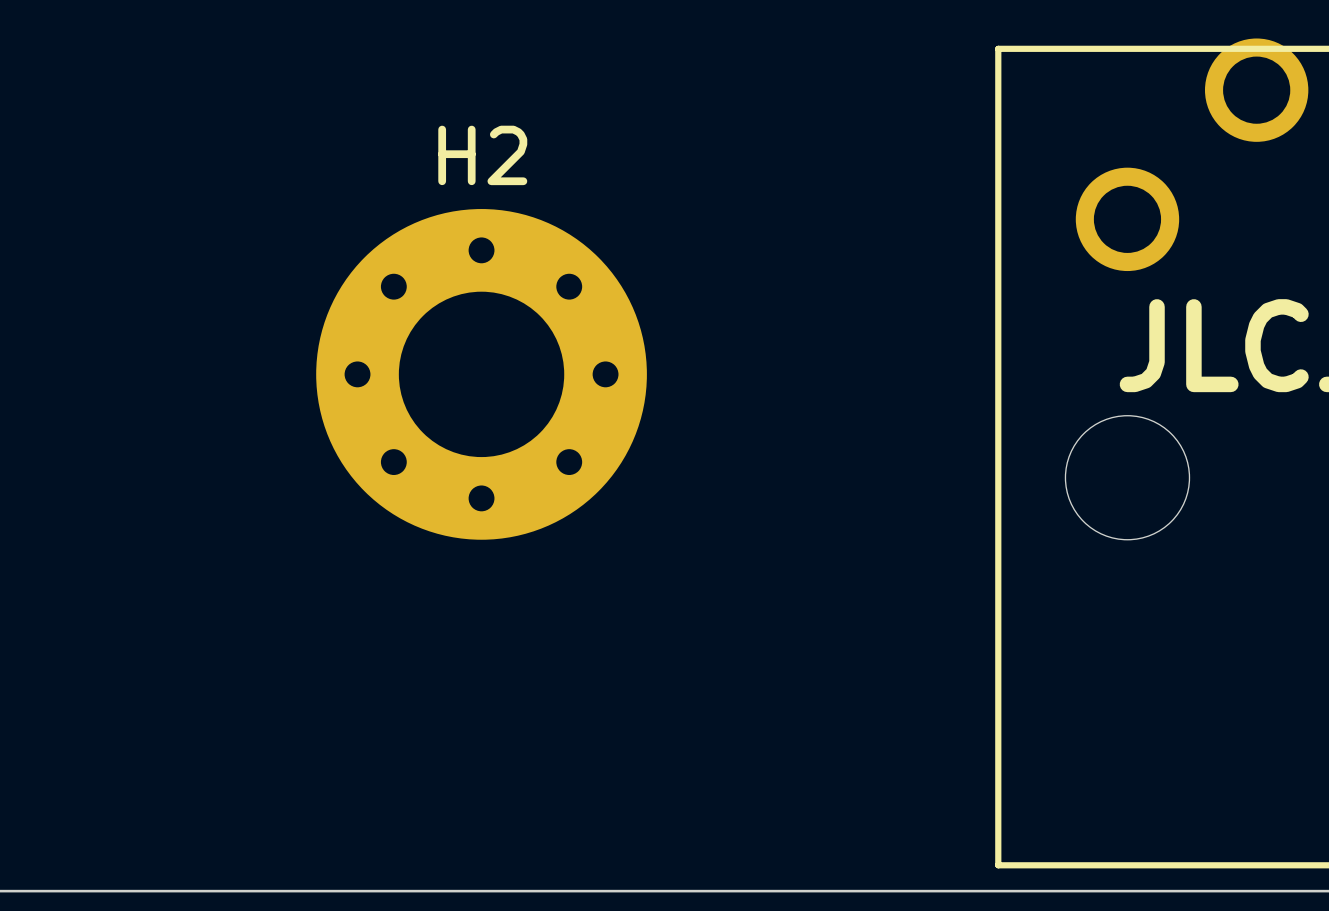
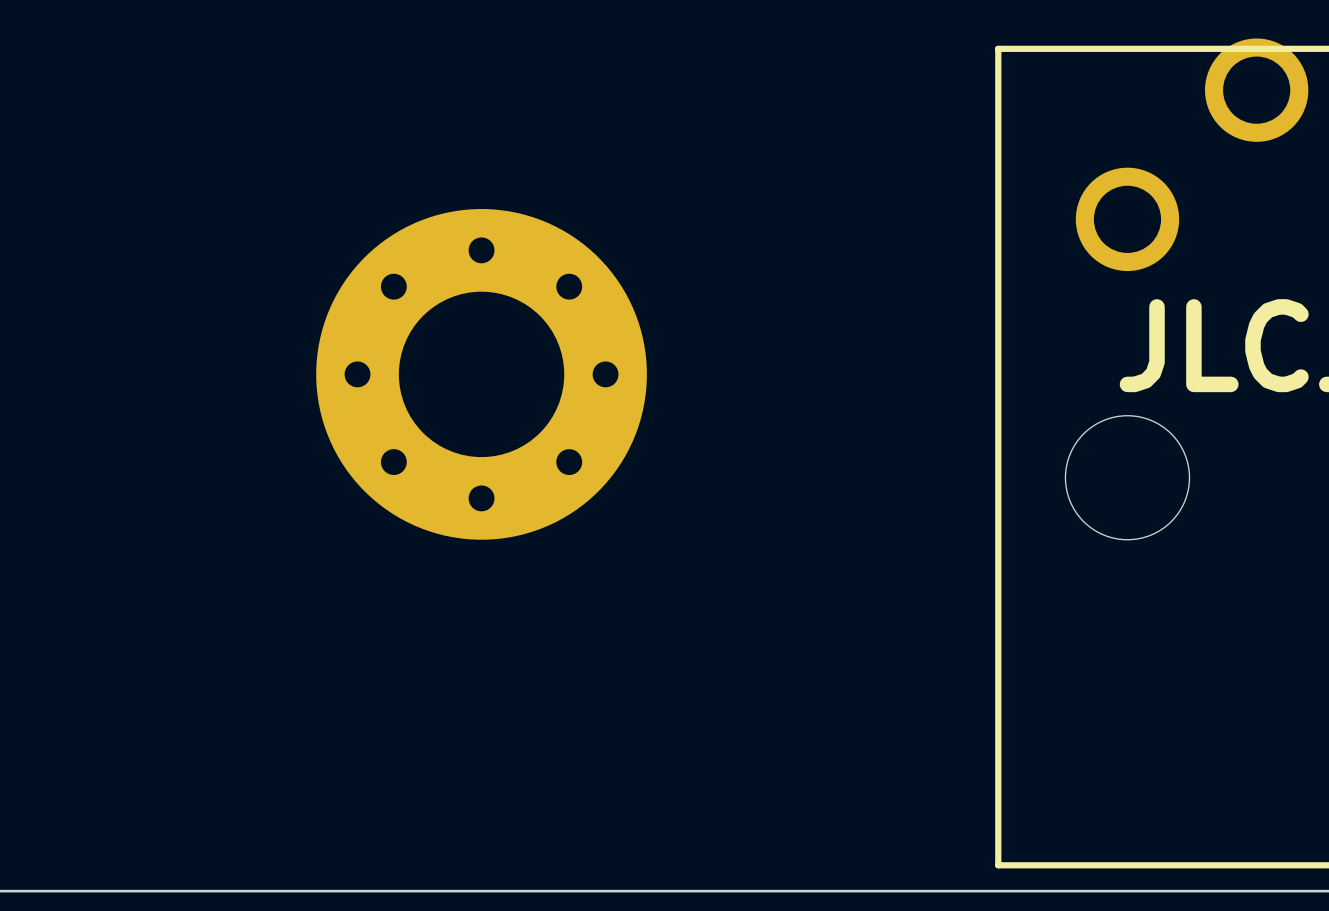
H2 name: H2 (482, 155) -> none

